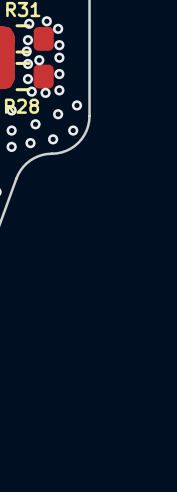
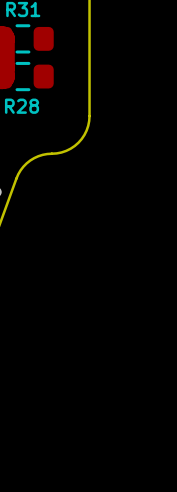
via: (46, 21) -> none
via: (29, 23) -> none
via: (58, 28) -> none
via: (27, 40) -> none
via: (59, 45) -> none
via: (26, 51) -> none
via: (59, 57) -> none
via: (39, 60) -> none
via: (27, 63) -> none
via: (59, 74) -> none
via: (27, 79) -> none
via: (59, 90) -> none
via: (31, 91) -> none
via: (45, 92) -> none
via: (76, 105) -> none
via: (11, 110) -> none
via: (58, 114) -> none
via: (35, 124) -> none
via: (11, 130) -> none
via: (73, 130) -> none
via: (53, 139) -> none
via: (30, 143) -> none
via: (11, 146) -> none

